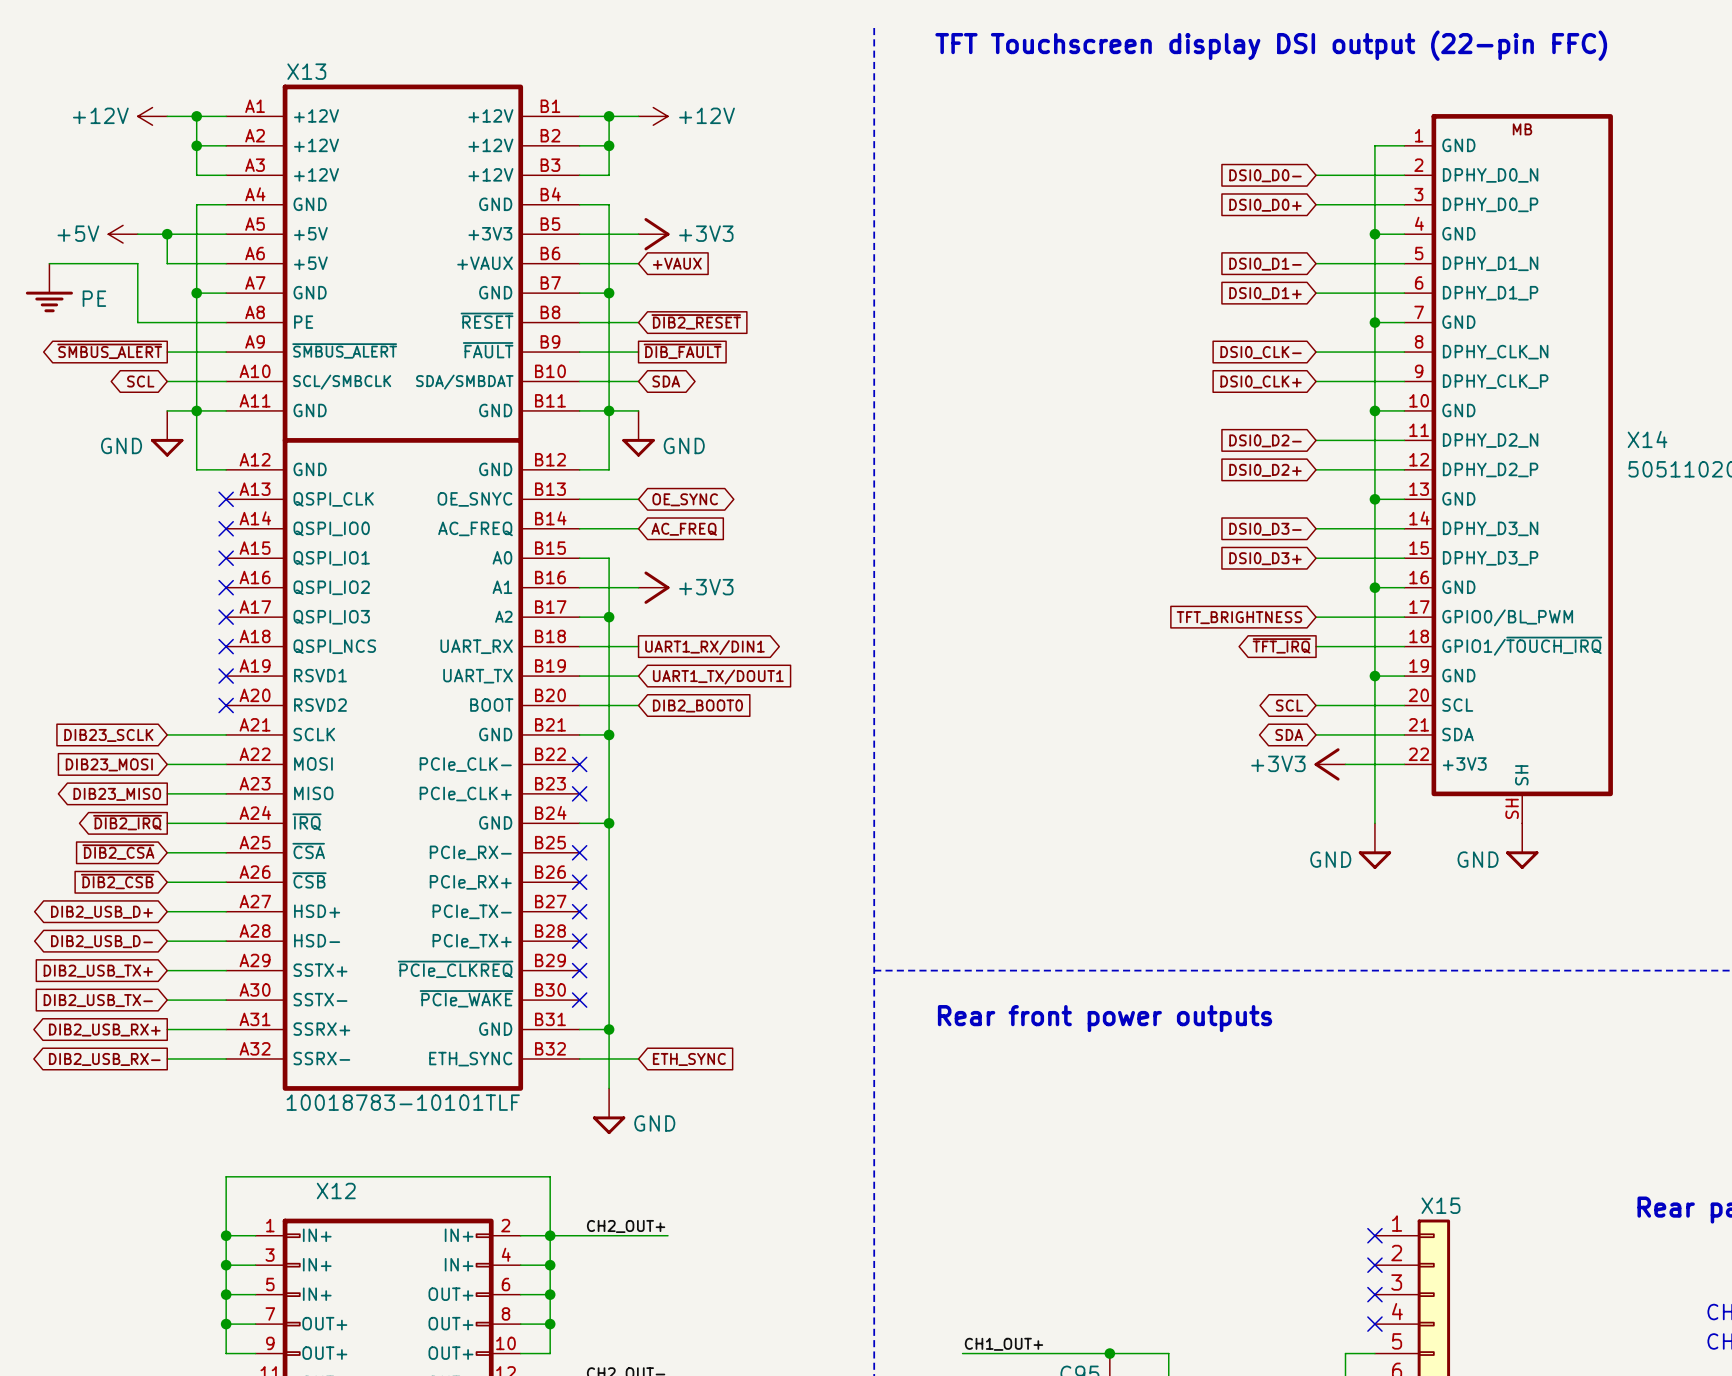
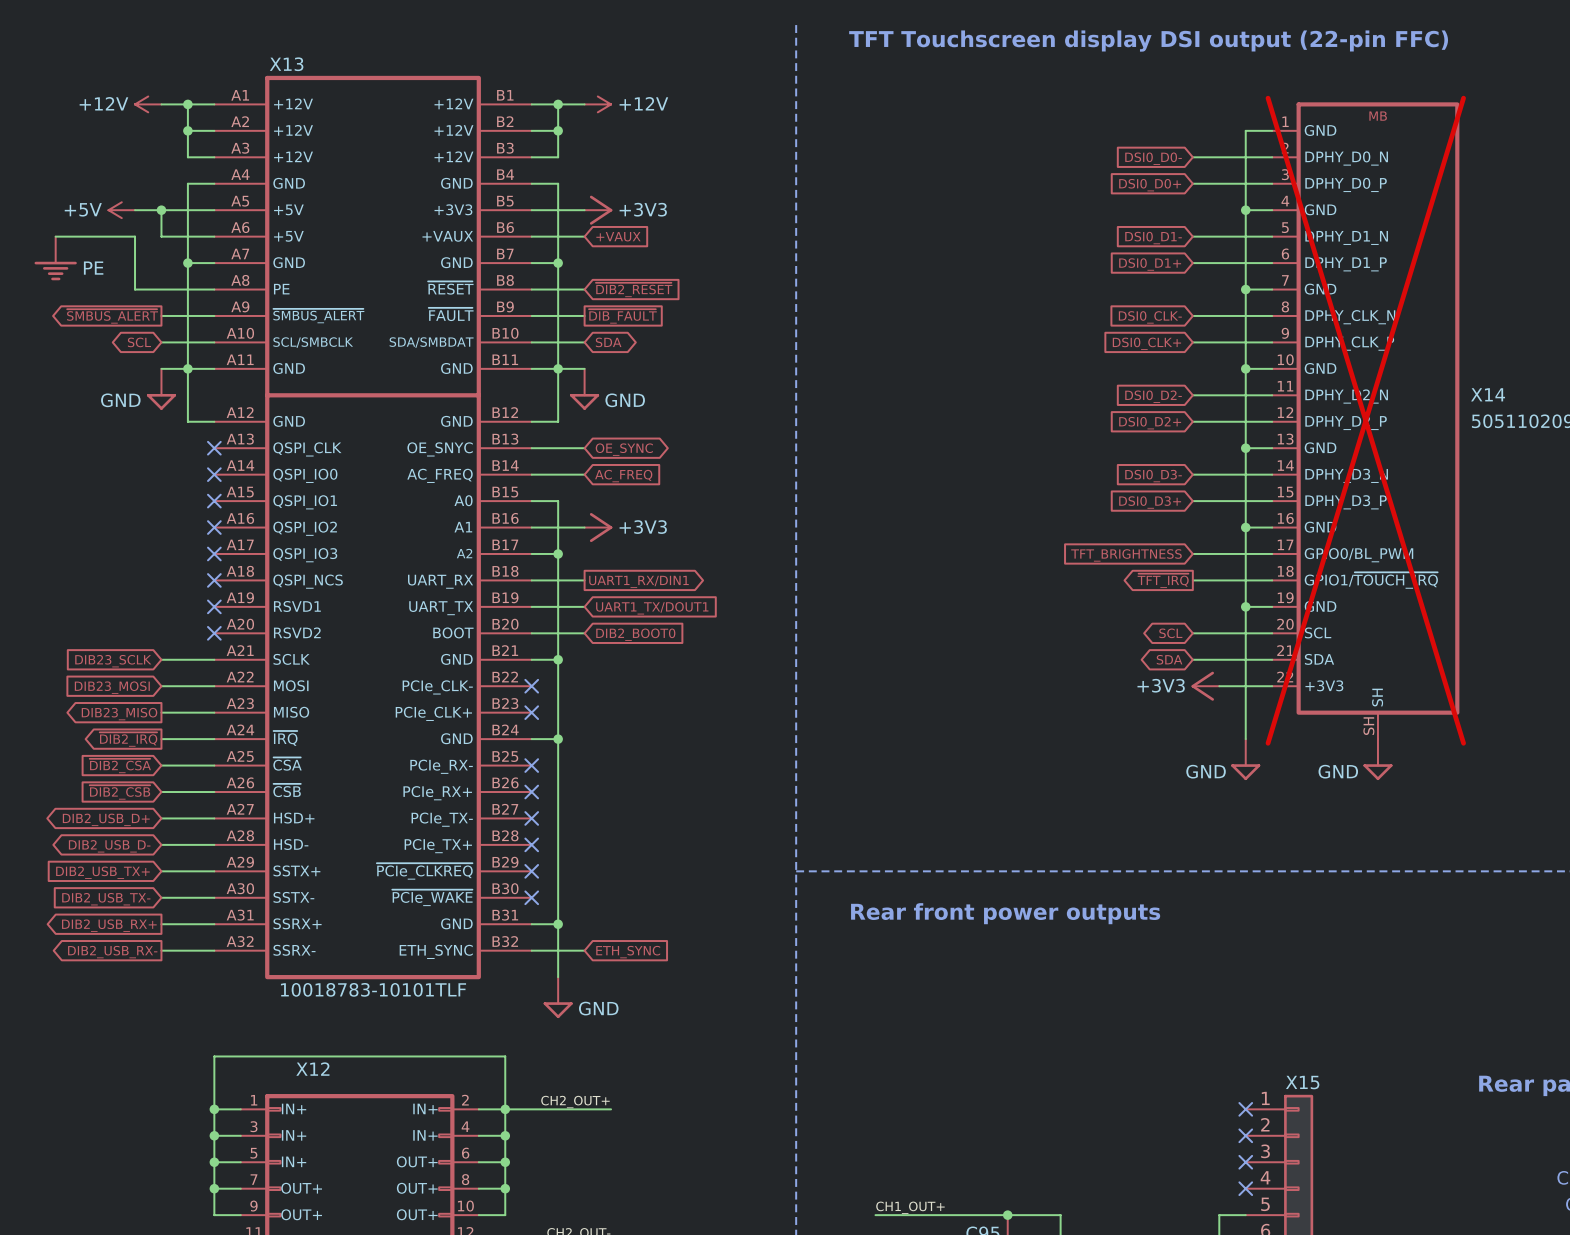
X14 do-not-place cross: none -> (1365, 420)

